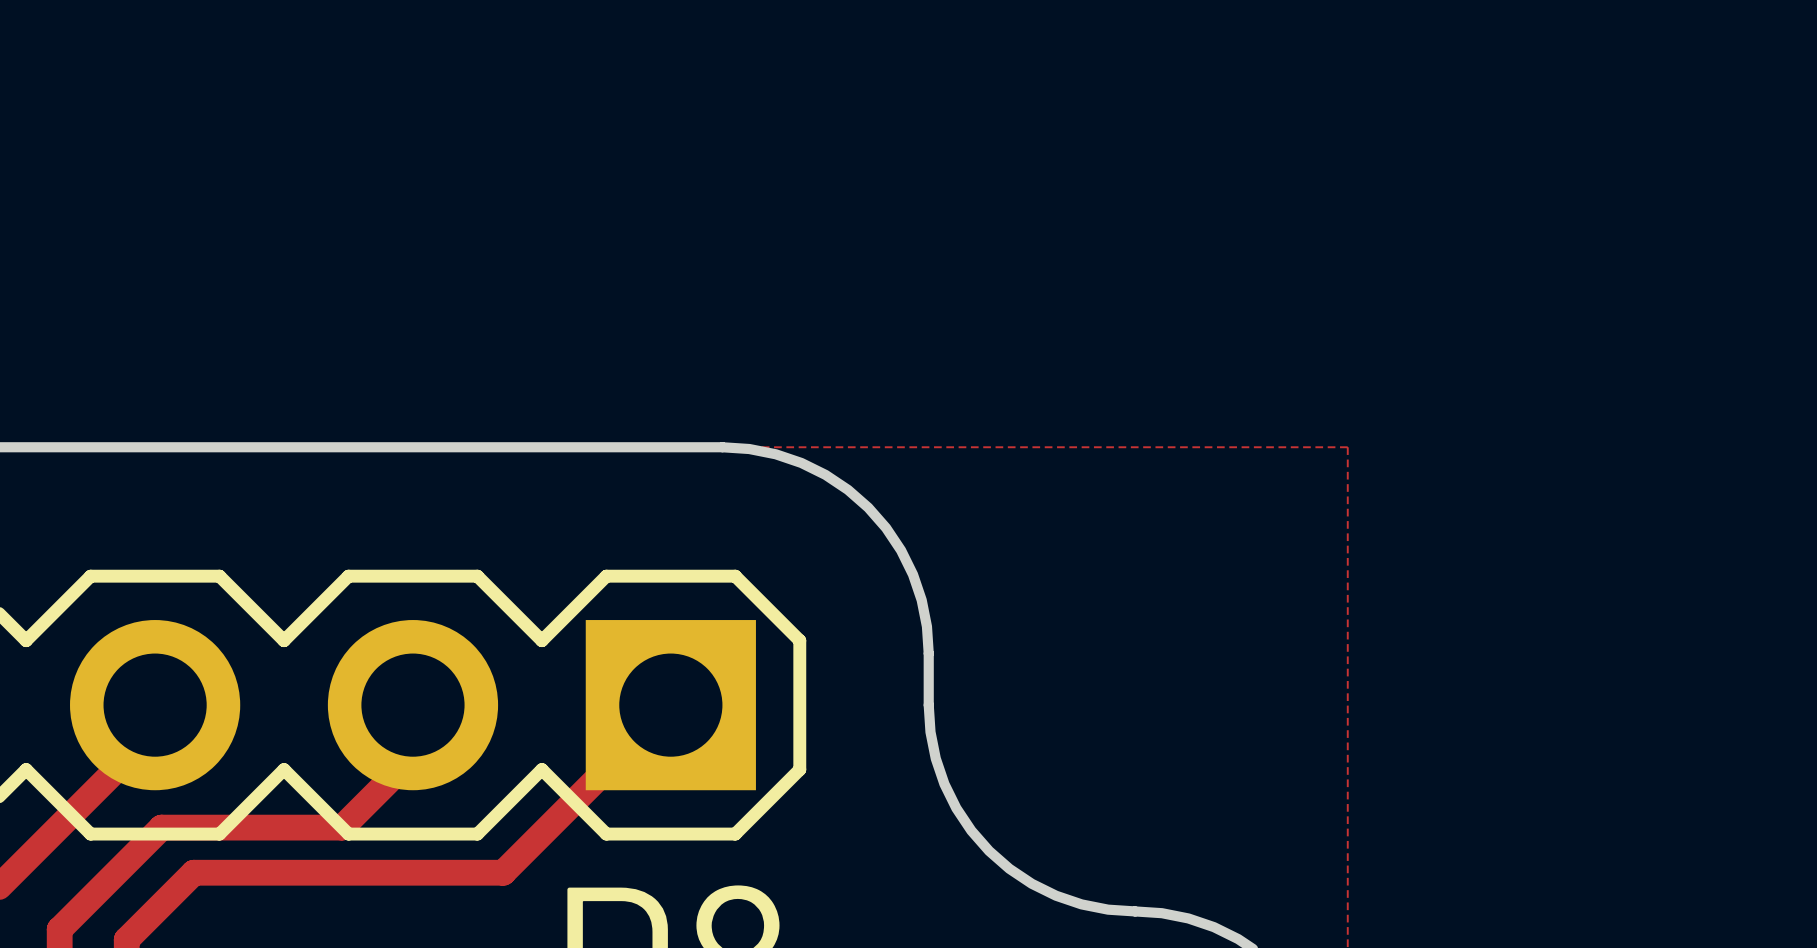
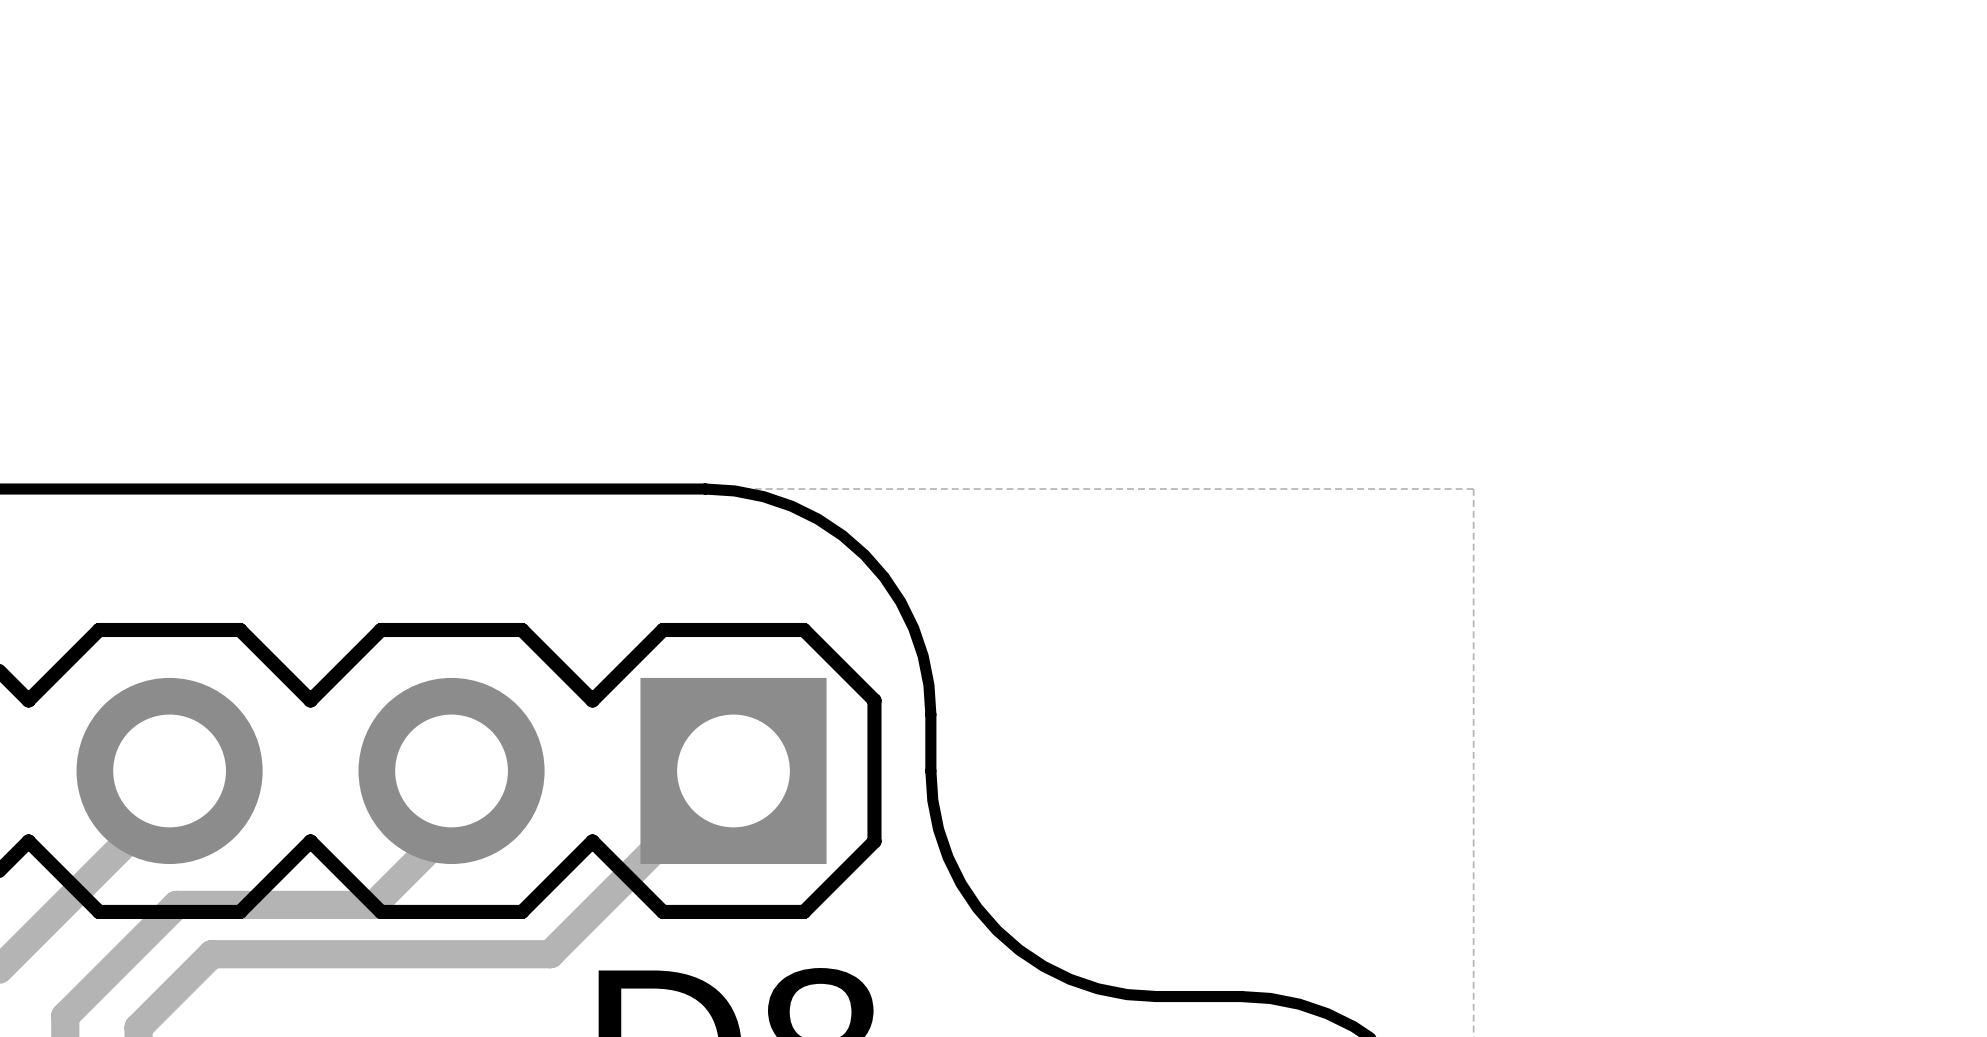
board edge: (645, 447) (722, 447) (749, 449) (775, 454) (801, 462) (825, 474) (848, 489) (868, 507) (886, 527) (901, 550) (913, 574) (921, 600) (926, 626) (930, 732) (935, 758) (944, 784) (956, 808) (971, 830) (989, 851) (1009, 868) (1031, 883) (1056, 895) (1081, 904) (1108, 909) (1135, 911) -> (705, 489) (734, 490) (763, 496) (791, 506) (818, 519) (842, 535) (864, 555) (884, 577) (900, 601) (913, 628) (923, 656) (928, 685) (932, 800) (938, 829) (948, 857) (961, 883) (977, 908) (996, 930) (1019, 949) (1043, 966) (1070, 979) (1098, 988) (1126, 994) (1156, 996) (1241, 996)

